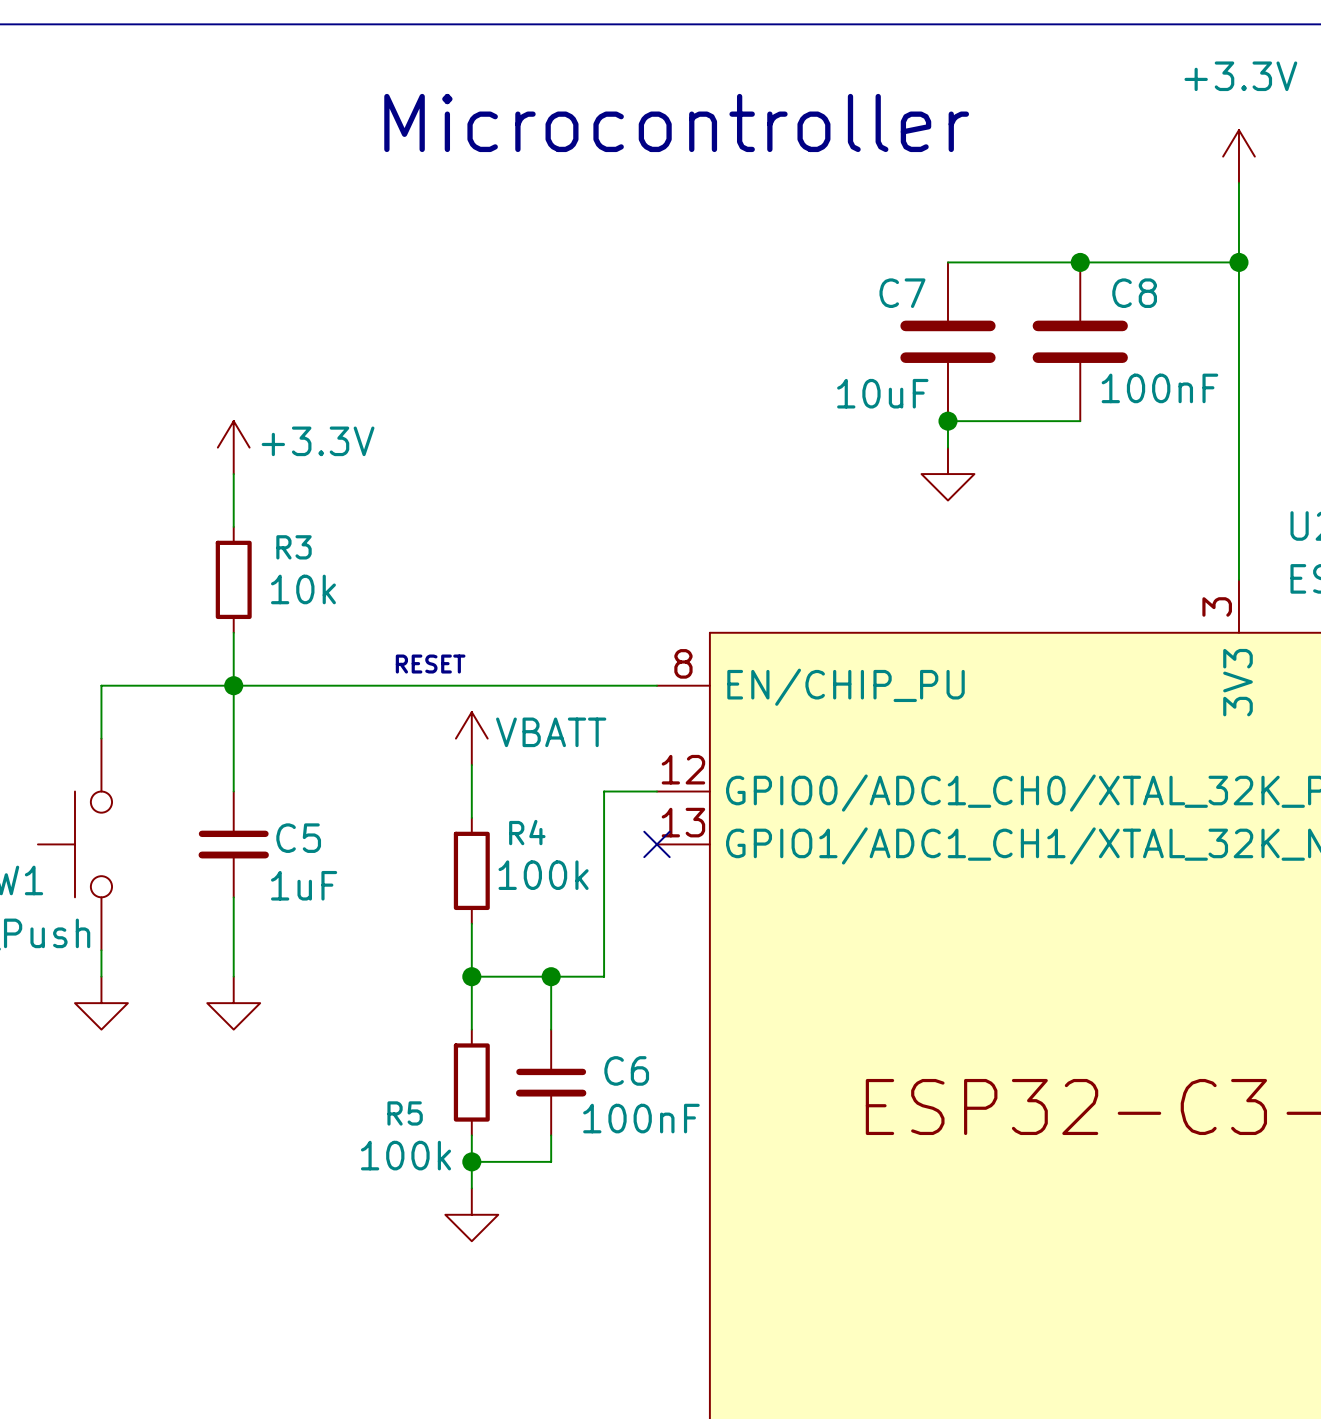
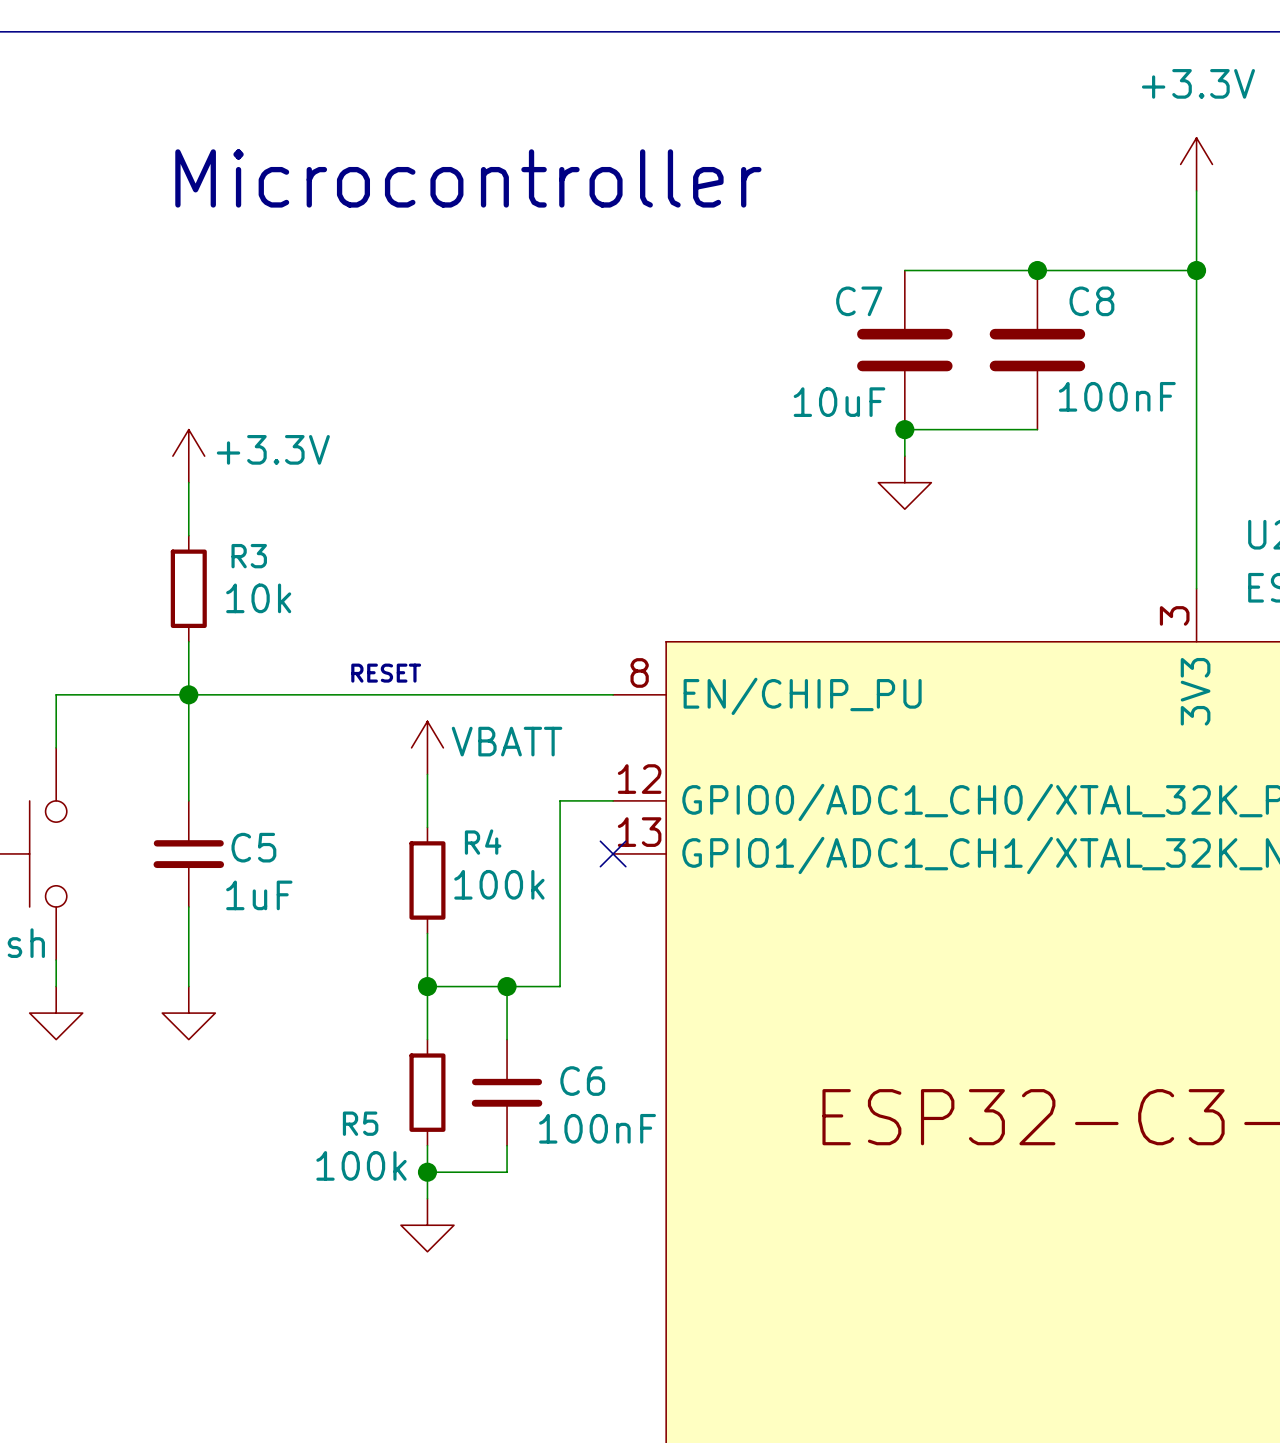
text position: Microcontroller (676, 122) -> Microcontroller (468, 178)

